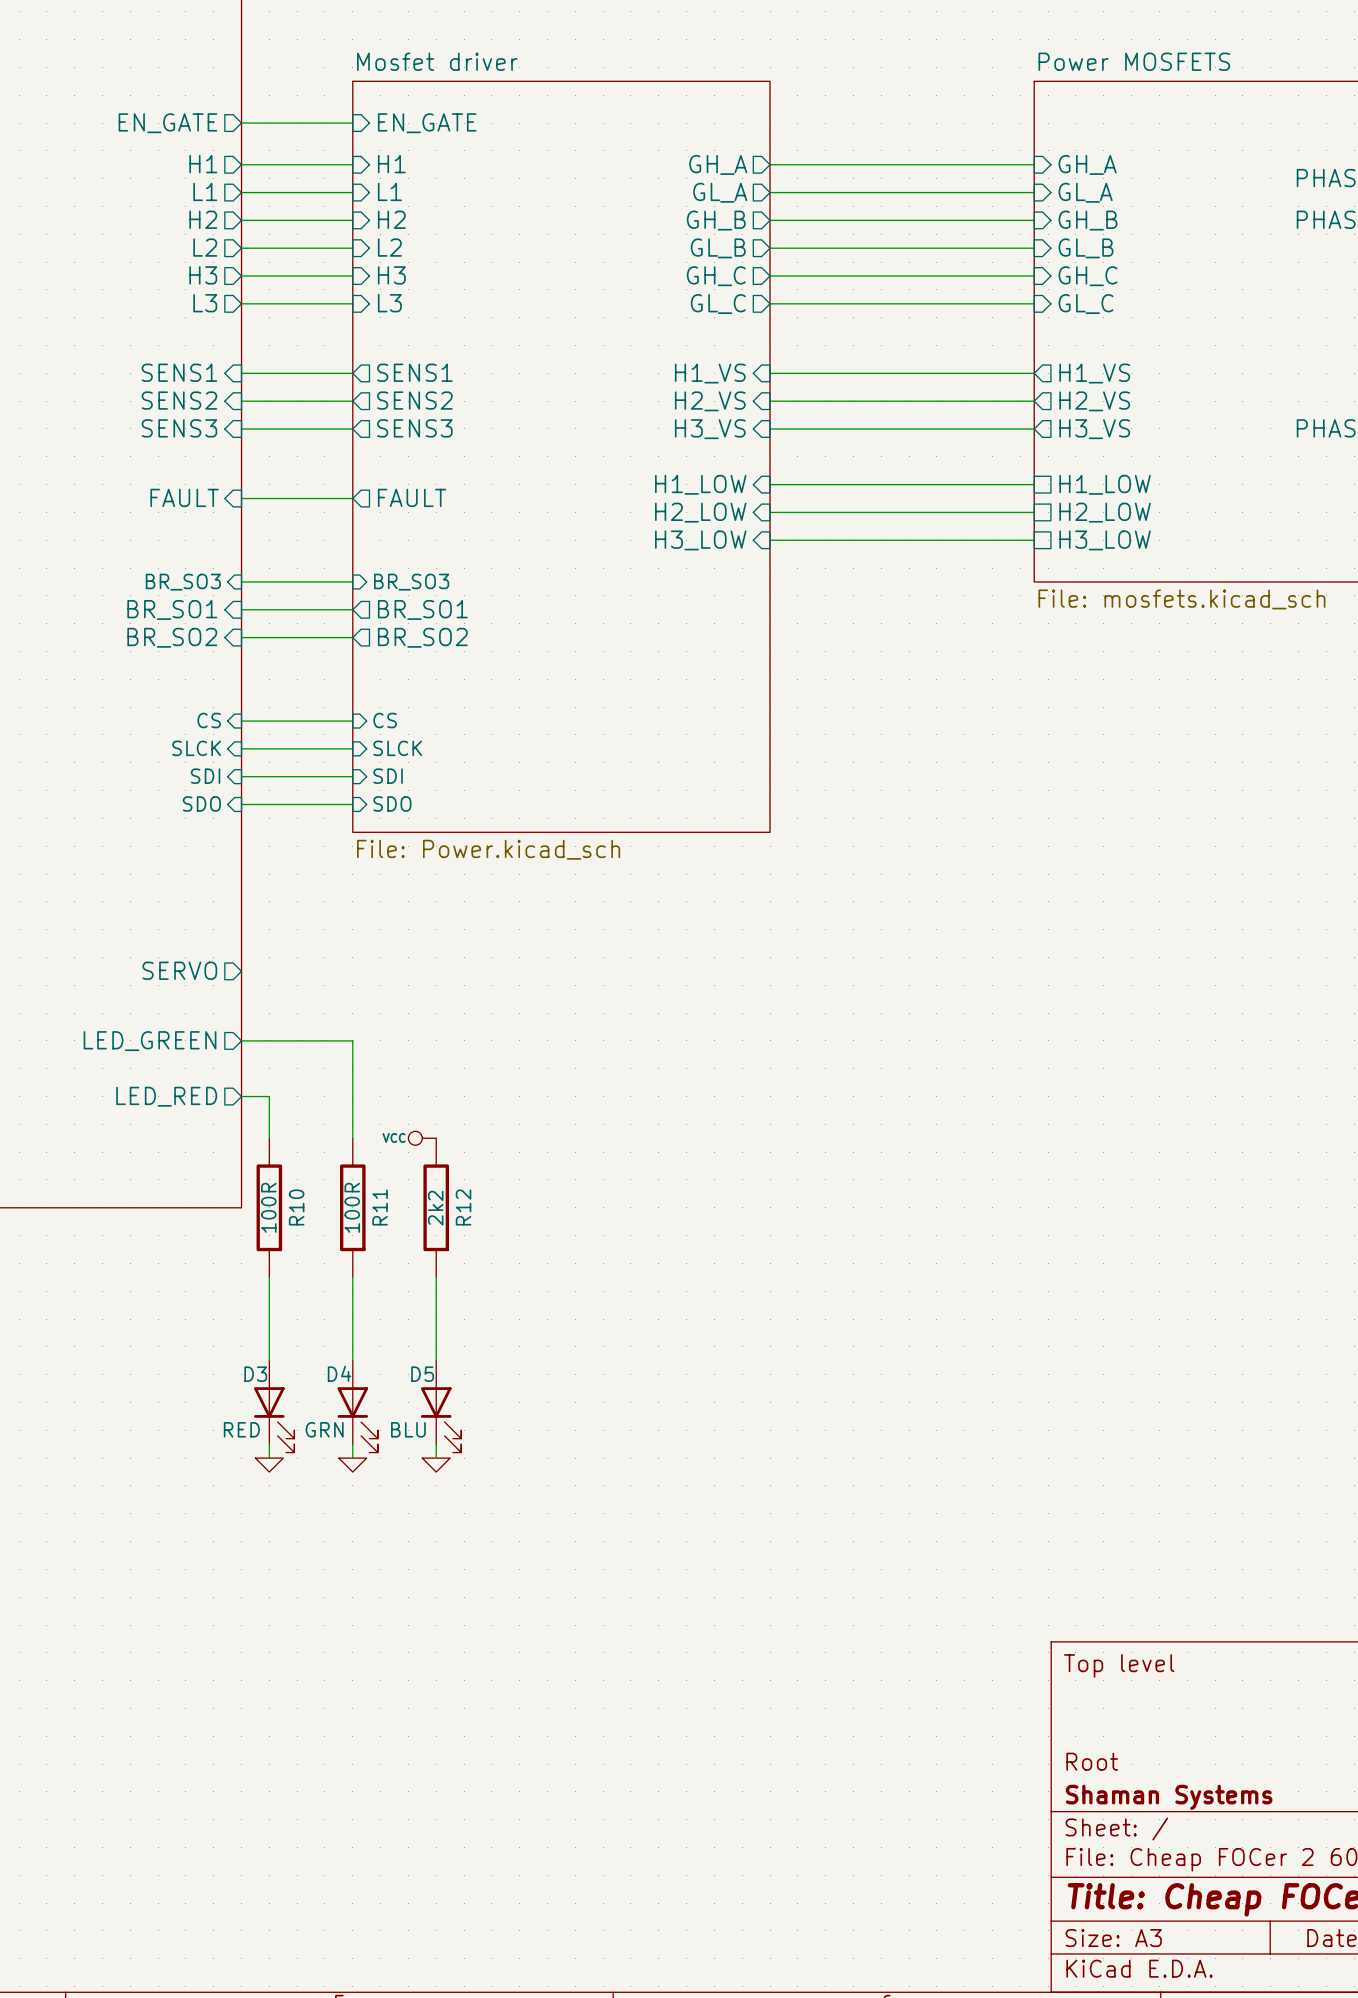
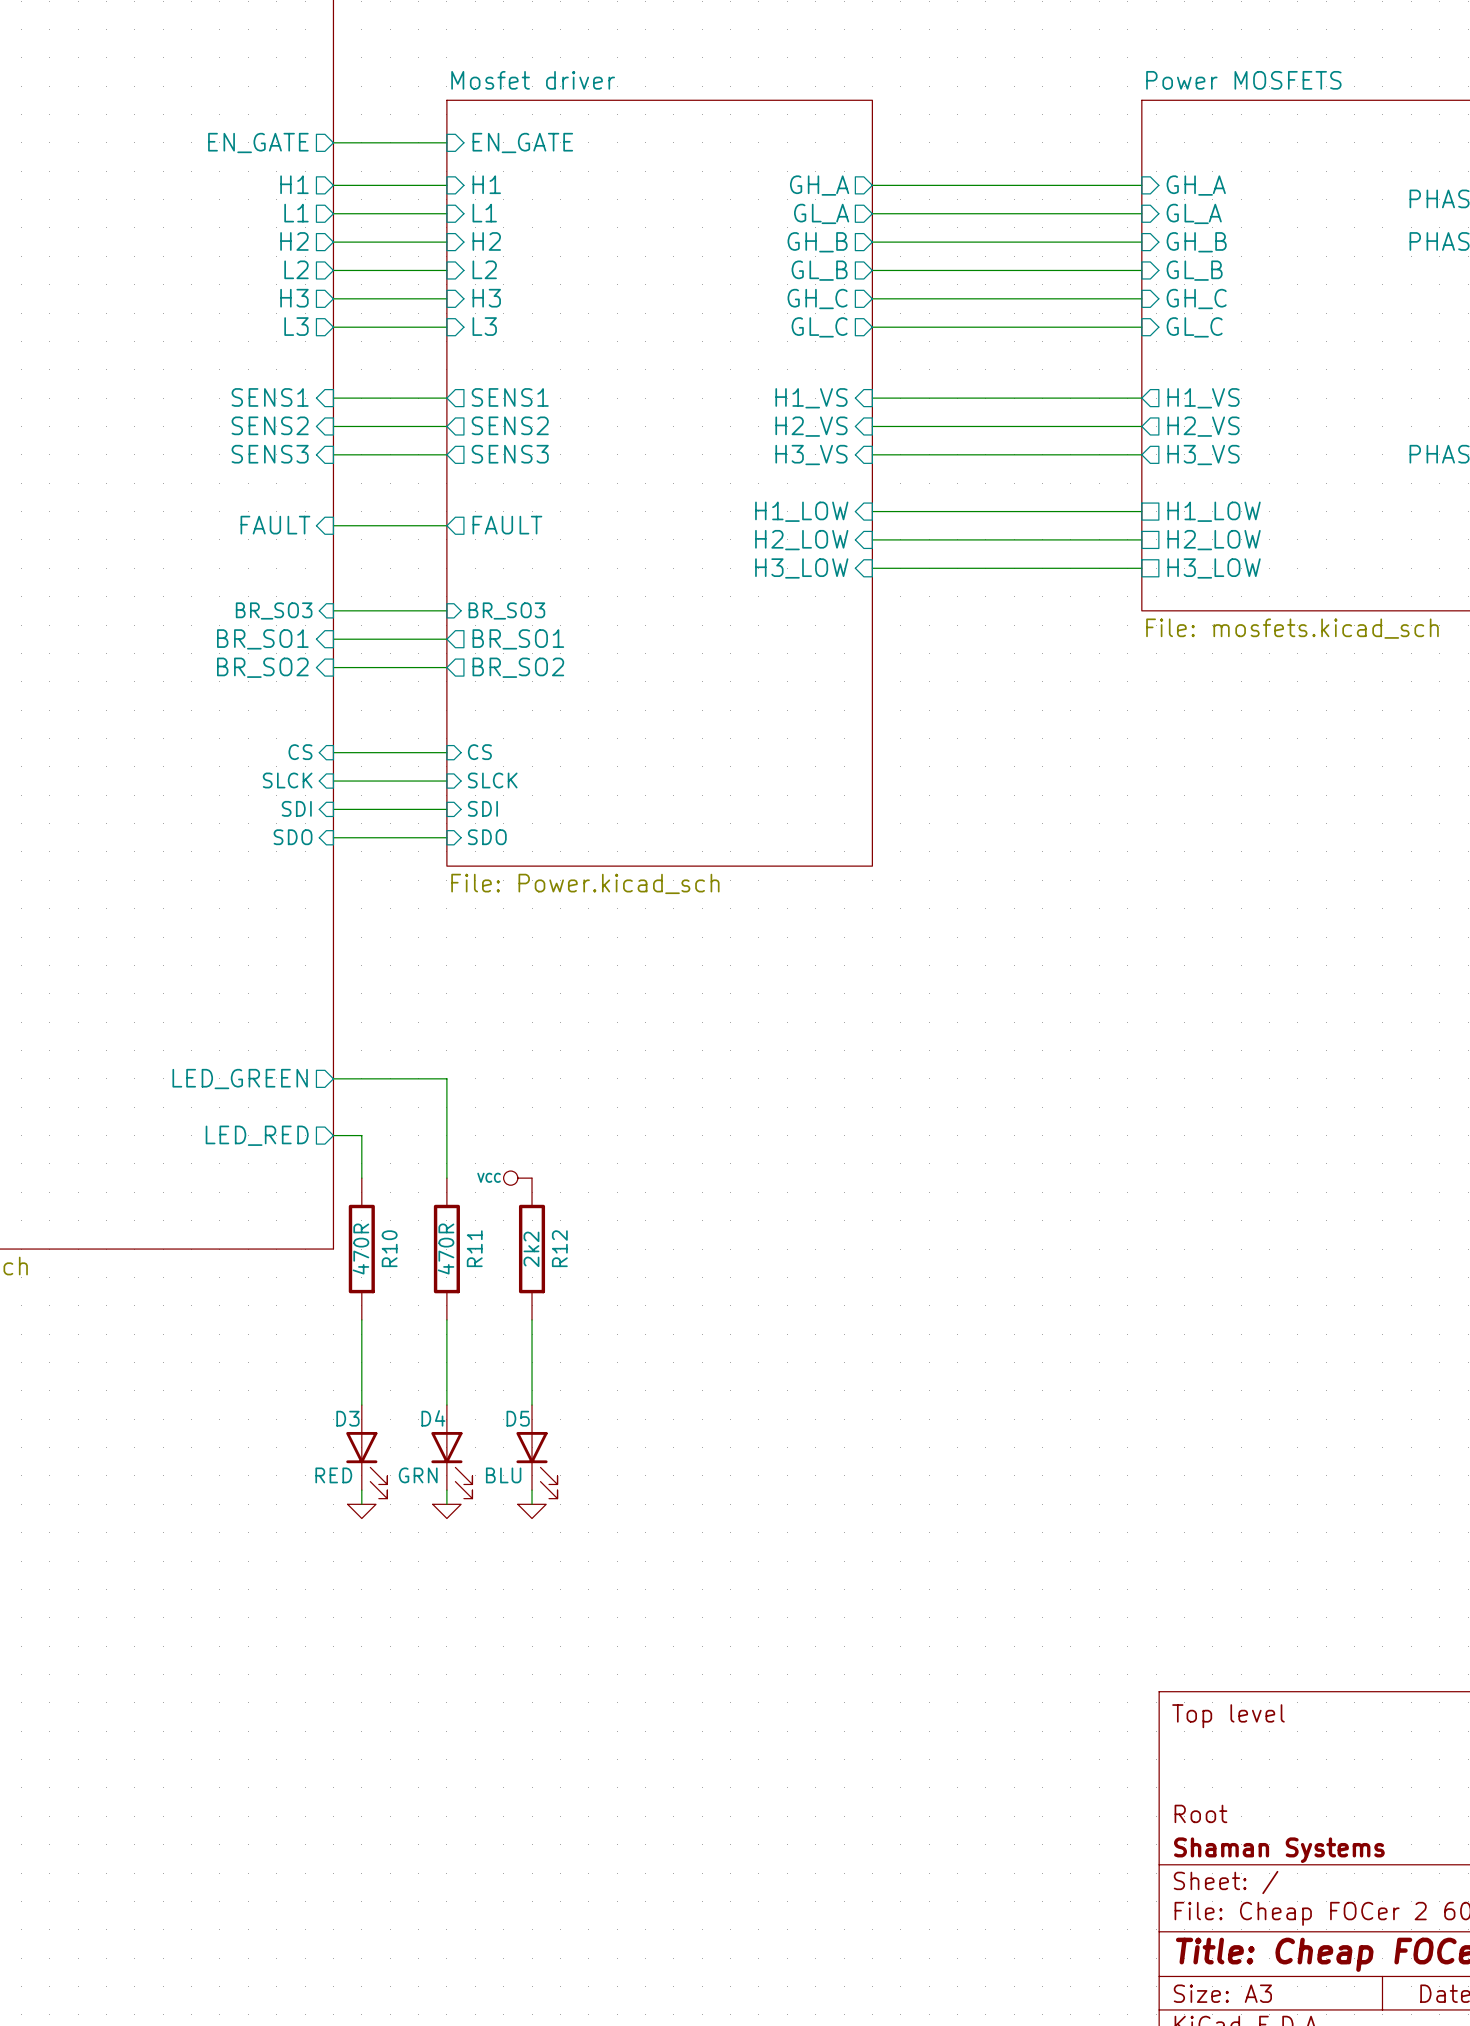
sheet pin: SERVO (179, 970) -> none
R10 value: 100R (268, 1207) -> 470R (360, 1249)
R11 value: 100R (352, 1207) -> 470R (446, 1249)

